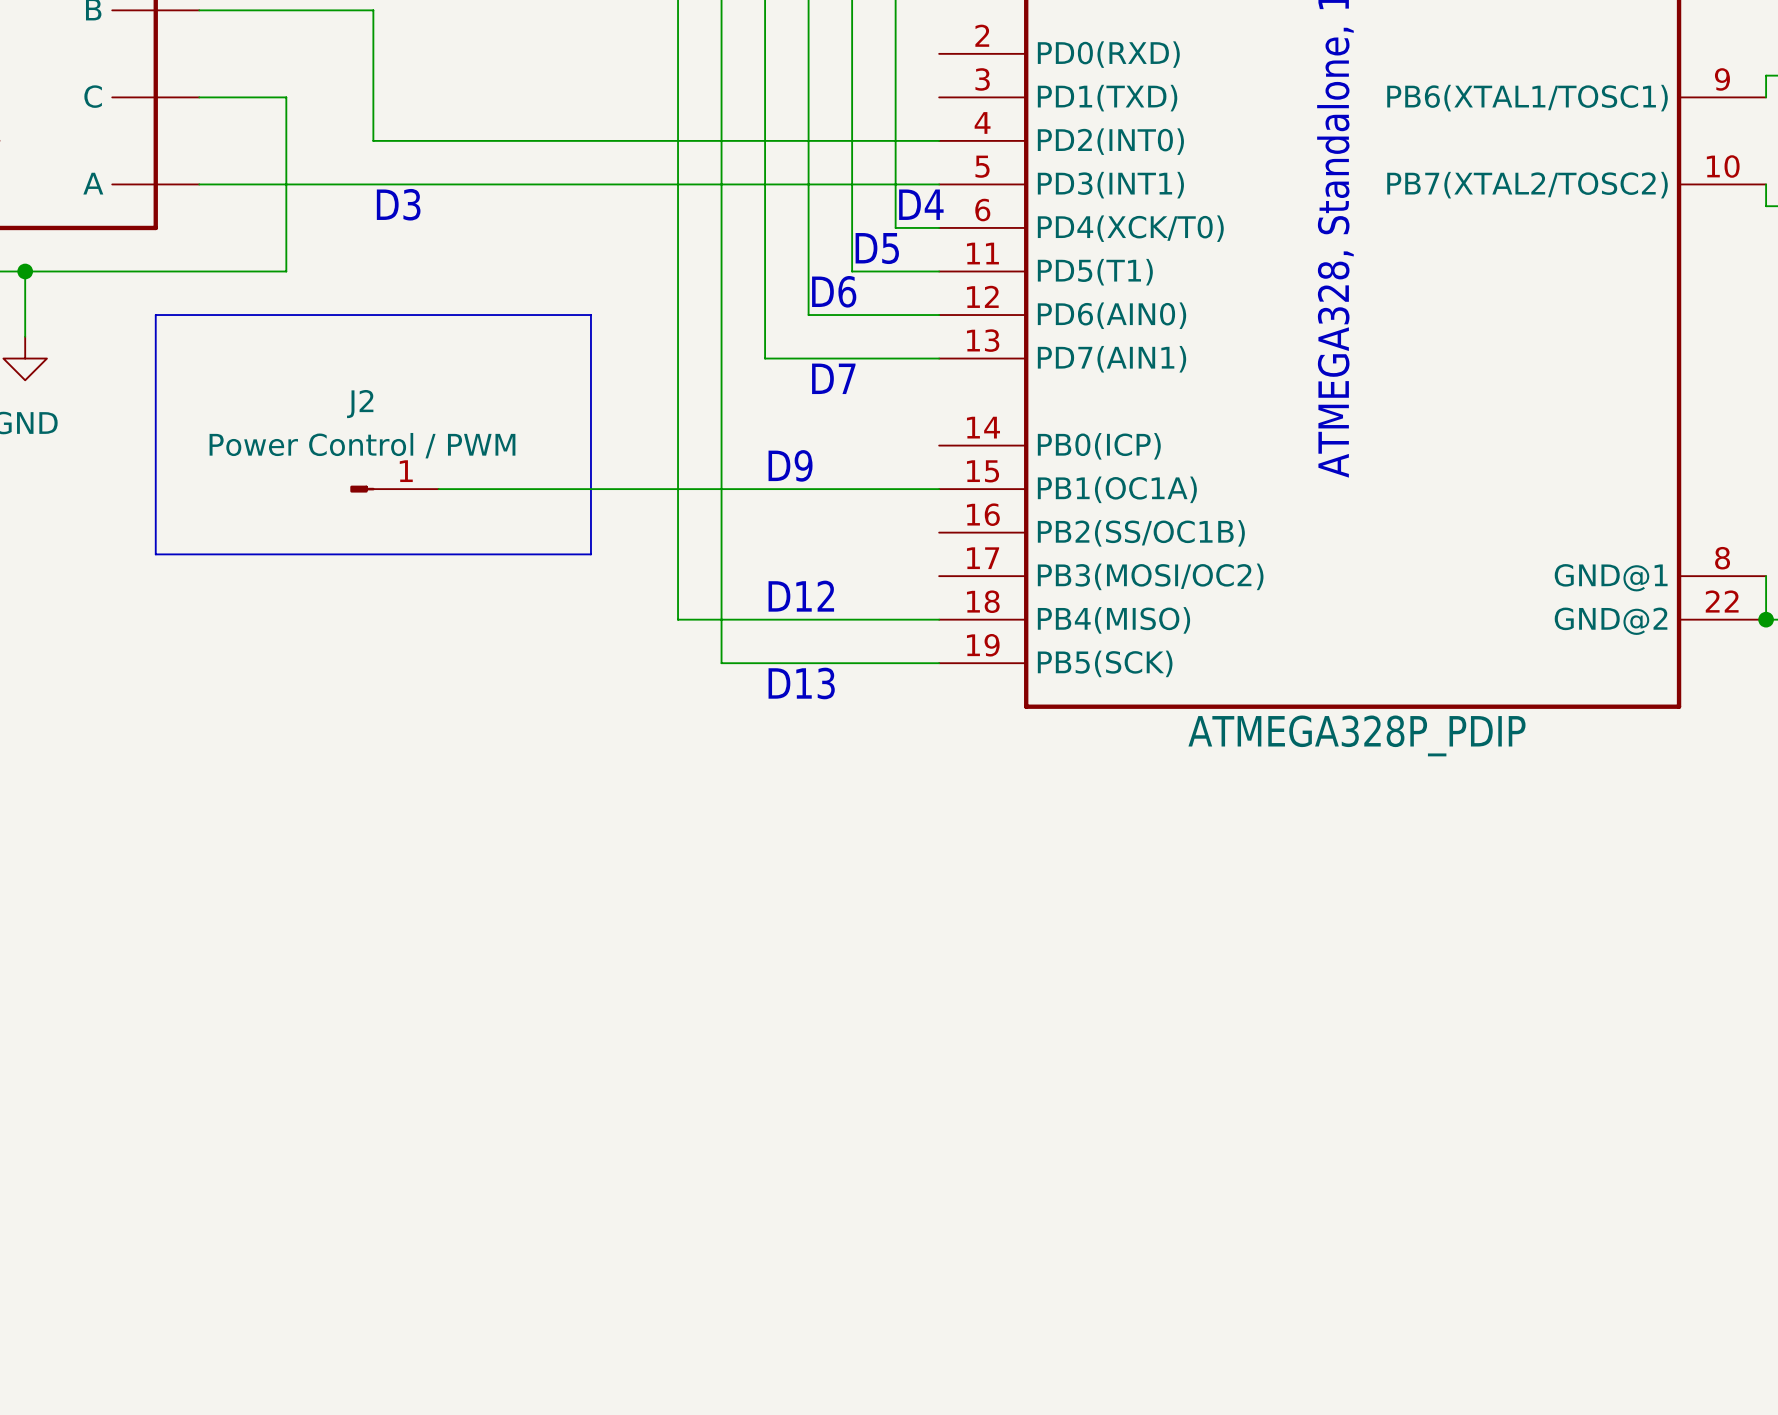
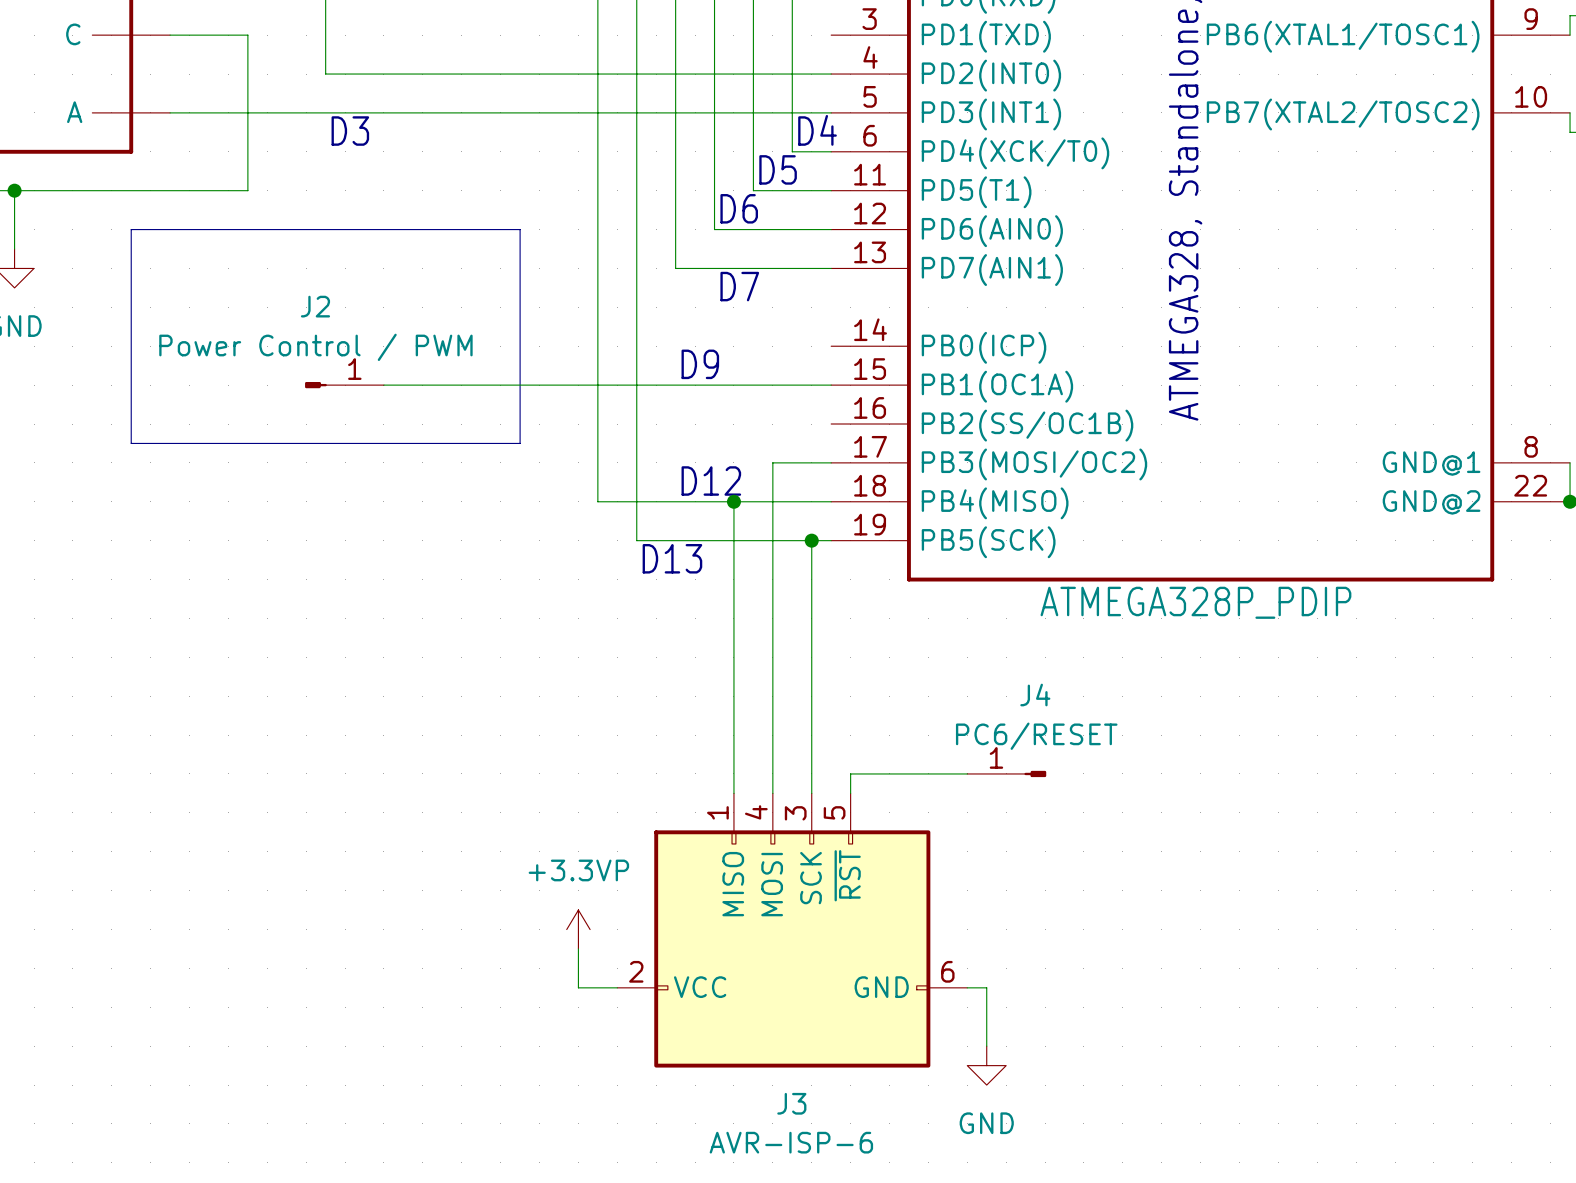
wire: none -> (831, 462) (772, 462) (772, 793)
wire: none -> (733, 501) (733, 793)
junction: none -> (733, 501)
wire: none -> (811, 540) (811, 793)
junction: none -> (811, 540)
text position: D13 (801, 683) -> D13 (672, 558)
wire: none -> (967, 773) (850, 773) (850, 793)
J4: none -> PC6/RESET (1006, 773)
power symbol: none -> +3.3VP (578, 929)
J3: none -> AVR-ISP-6 (792, 930)
wire: none -> (578, 948) (578, 987) (617, 987)
wire: none -> (967, 987) (986, 987) (986, 1046)
power symbol: none -> GND (986, 1065)

